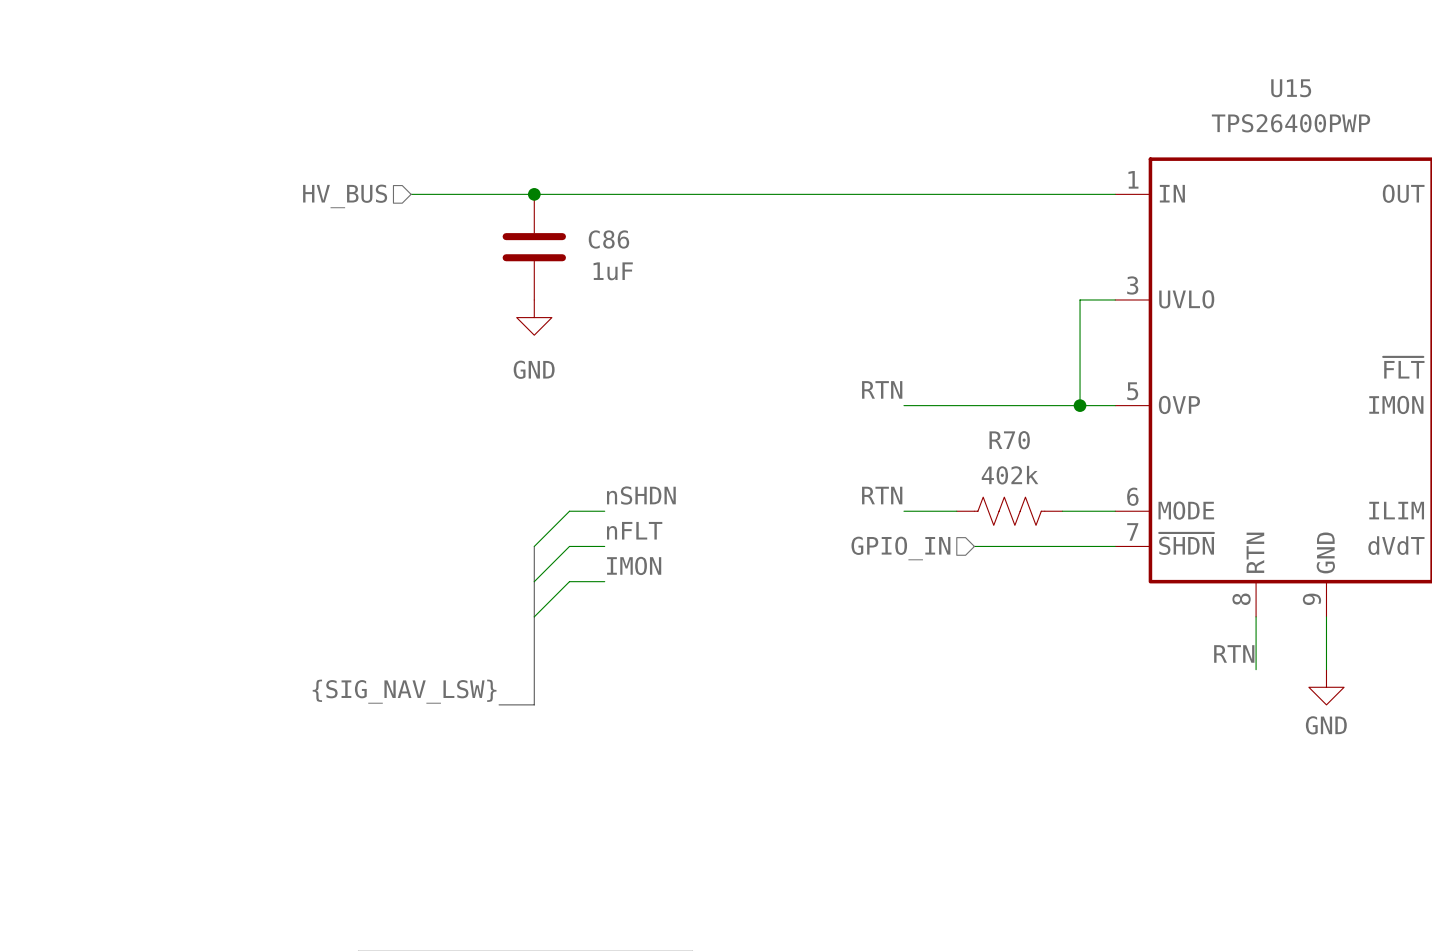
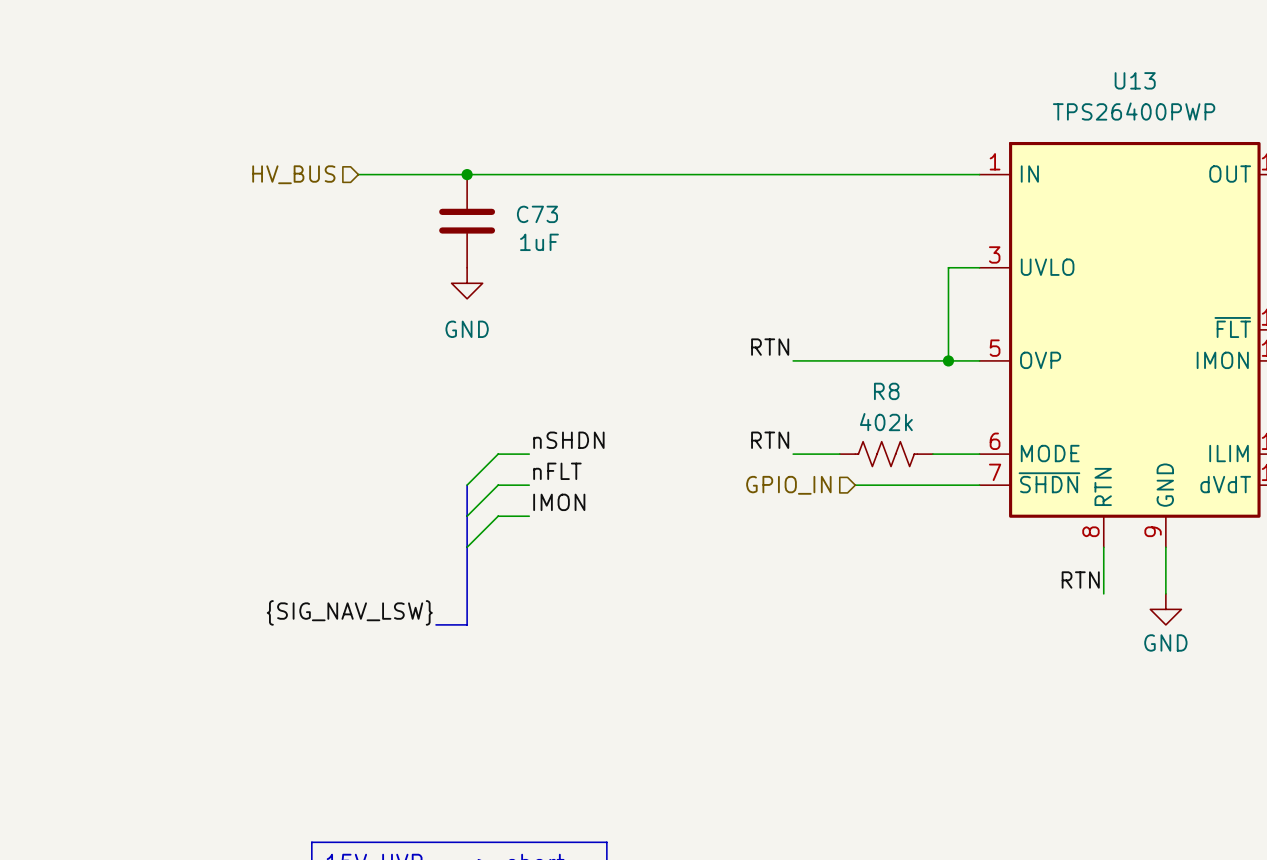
U15 name: U15 (1291, 88) -> U13 (1135, 80)
C86 name: C86 (608, 239) -> C73 (537, 214)
R70 name: R70 (1009, 440) -> R8 (886, 391)

